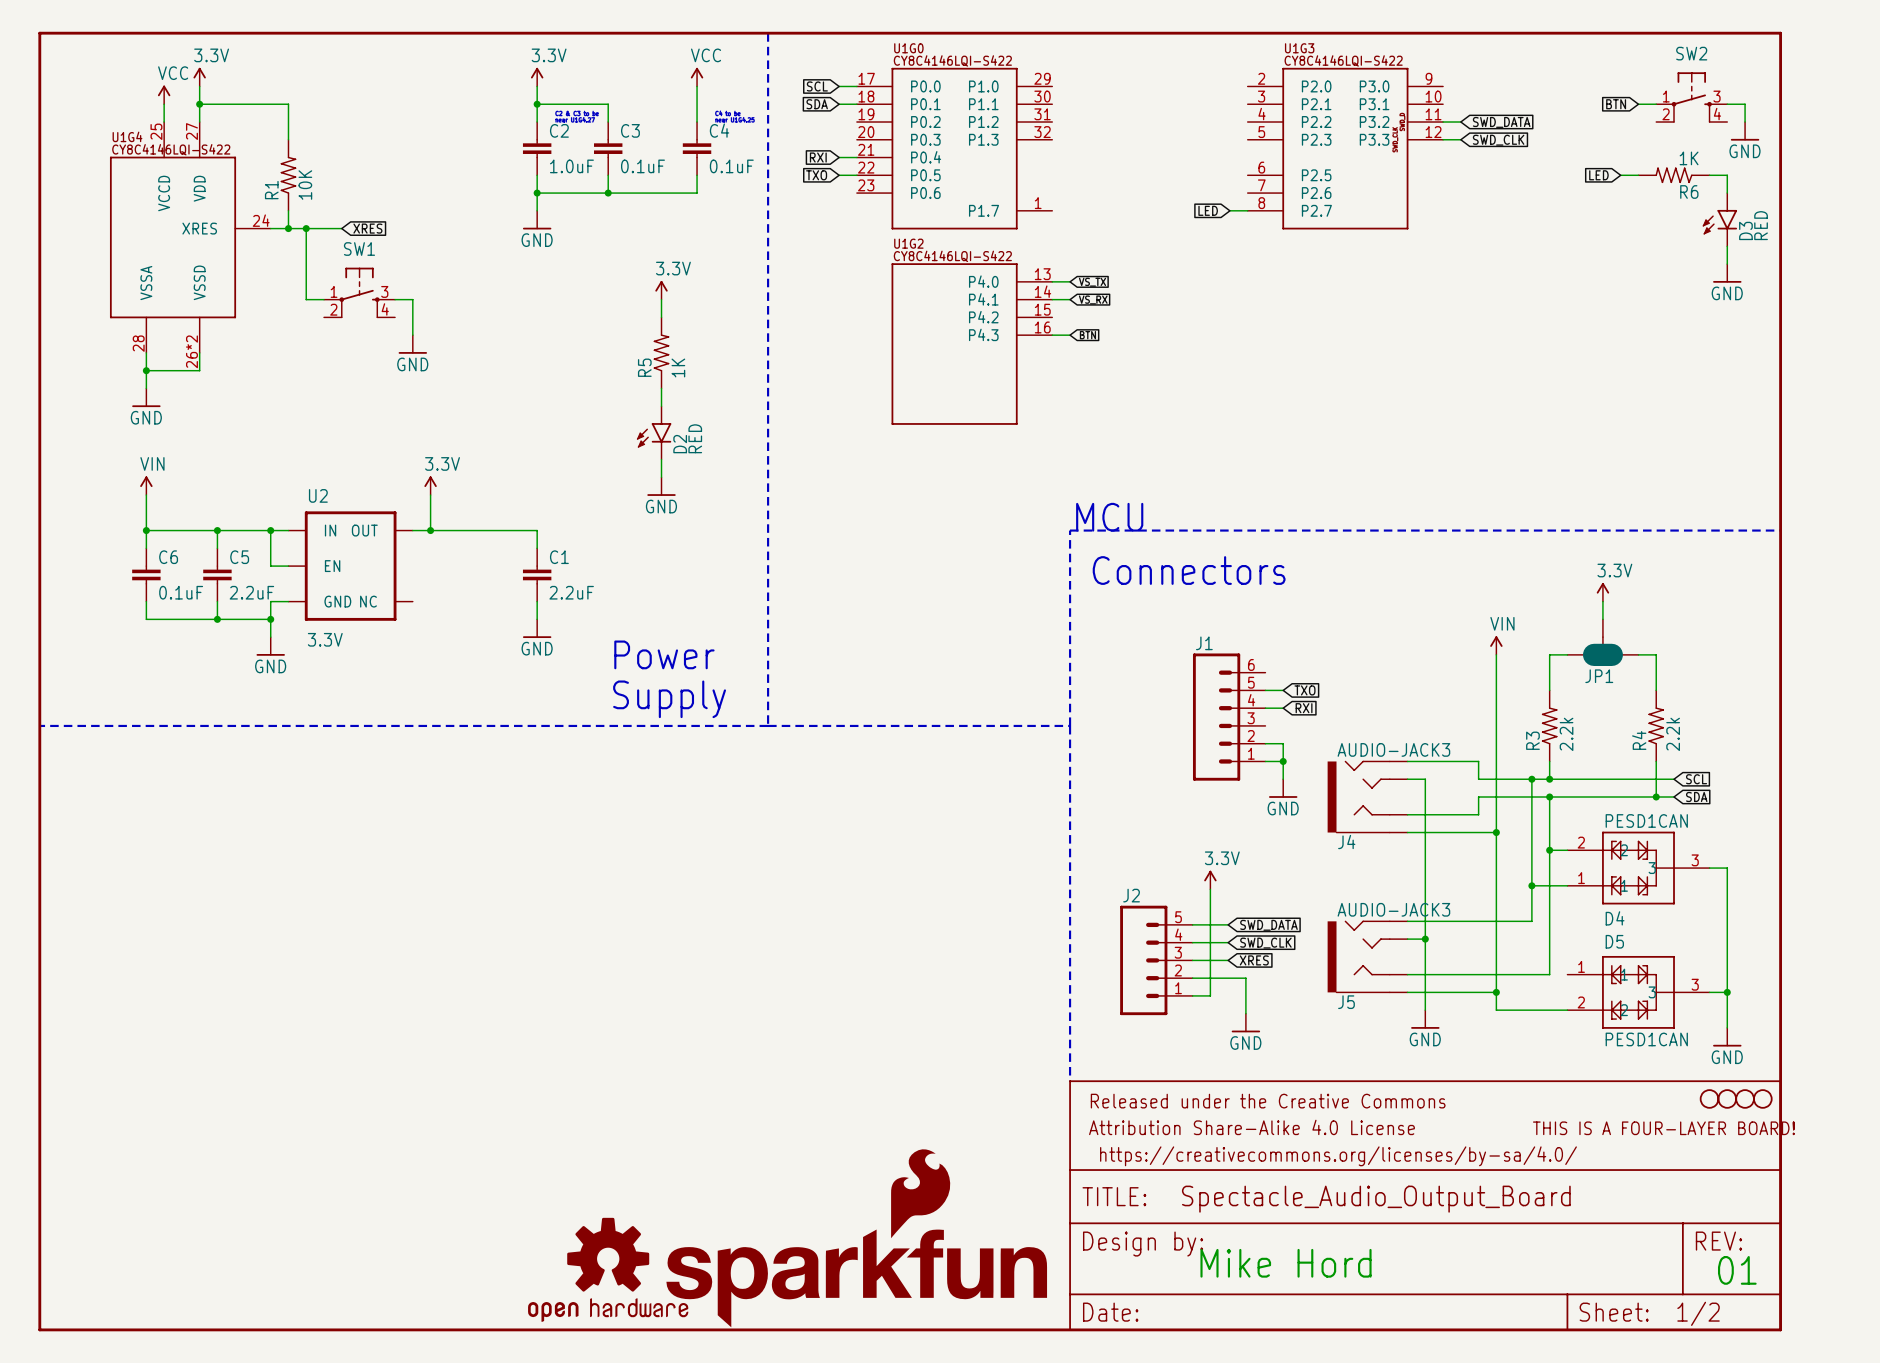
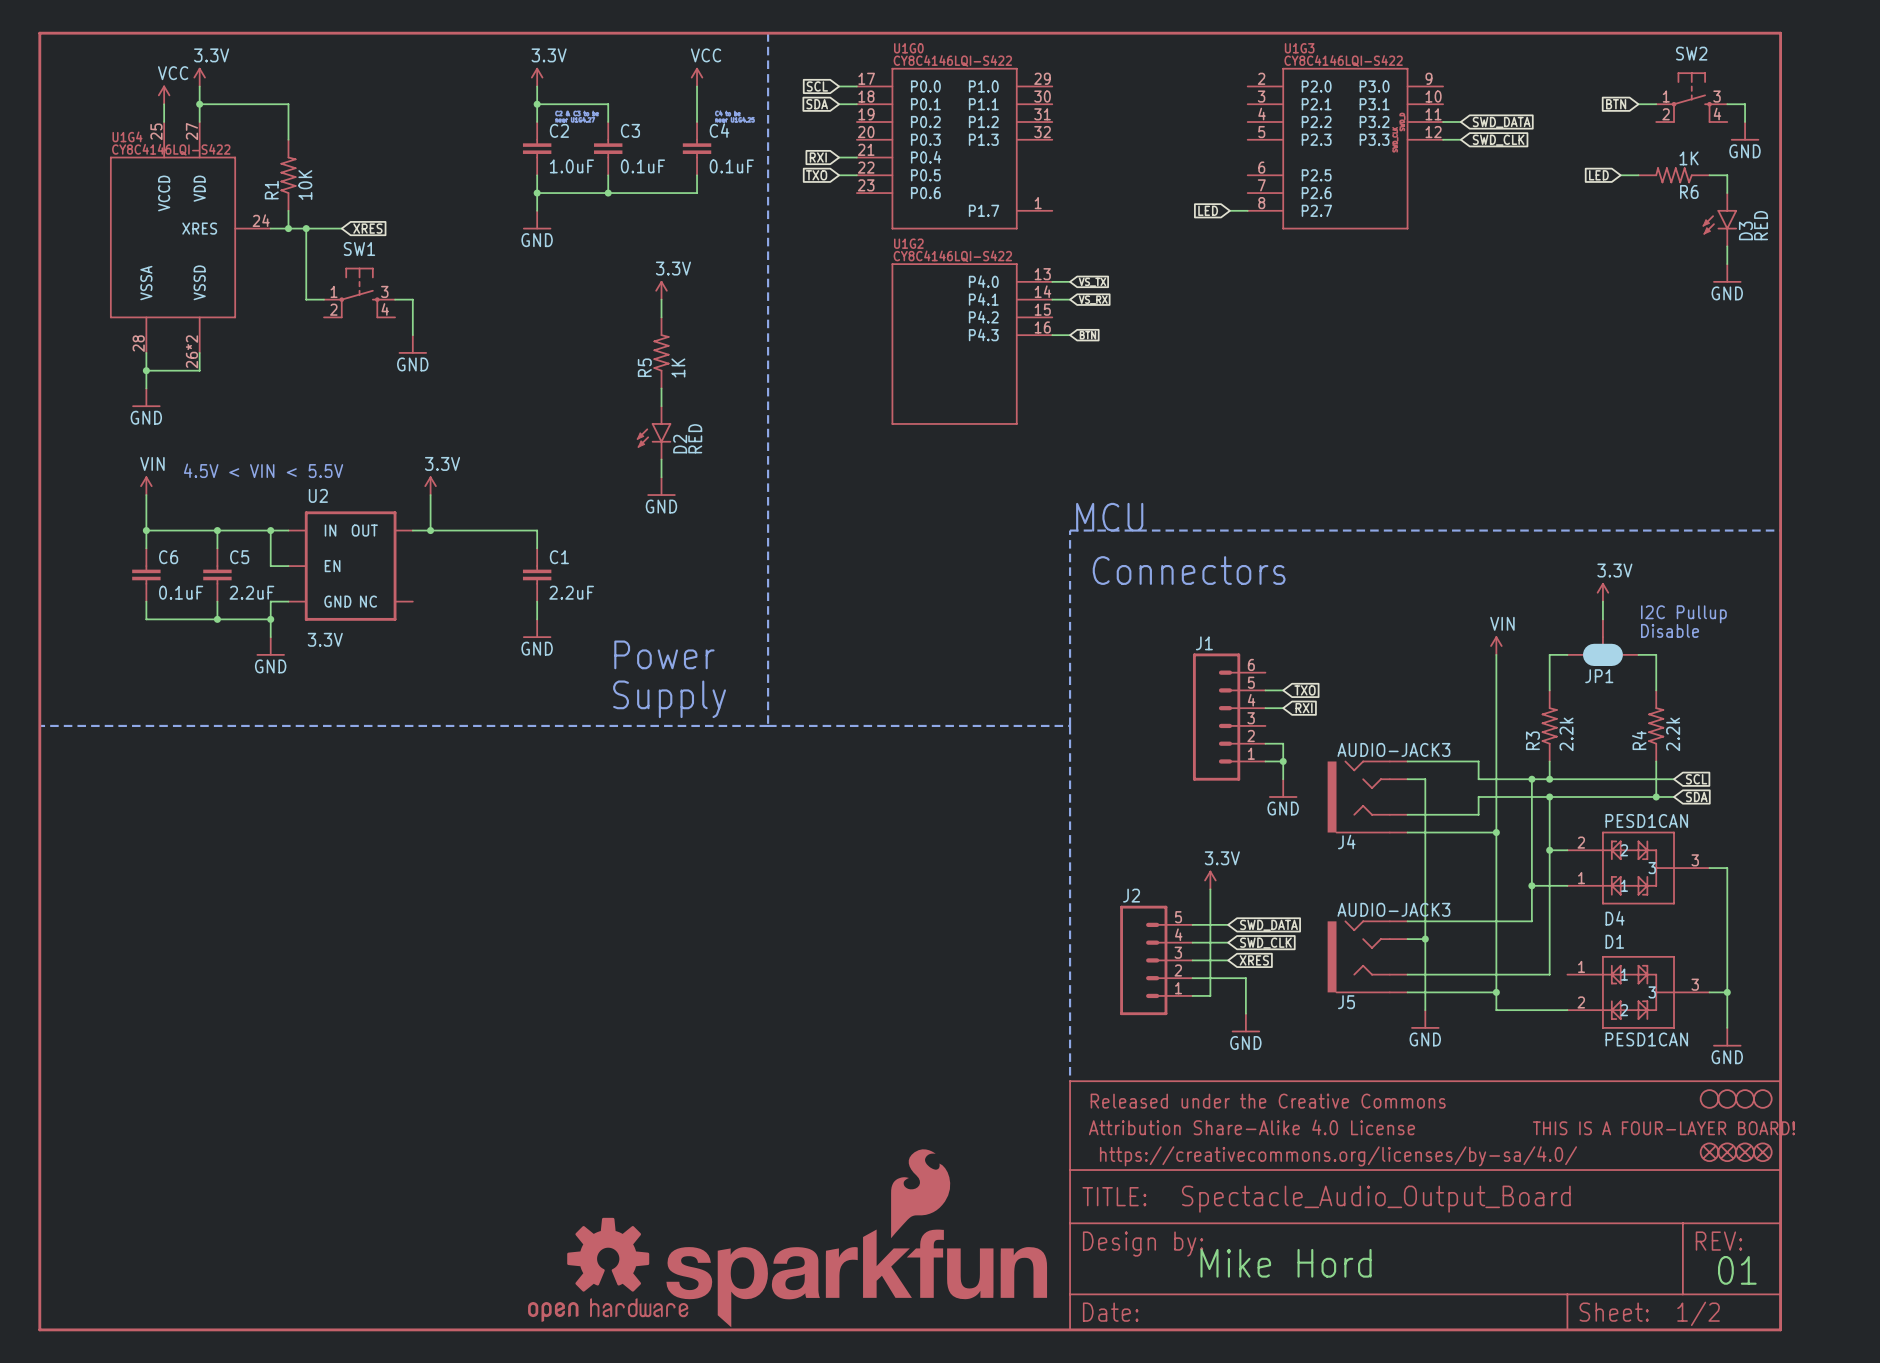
text: none -> 4.5V < VIN < 5.5V (263, 470)
text: none -> I2C Pullup (1683, 614)
text: none -> Disable (1670, 630)
D5 name: D5 (1614, 941) -> D1 (1614, 941)
part: none -> (1709, 1152)
part: none -> (1727, 1152)
part: none -> (1745, 1152)
part: none -> (1762, 1152)

